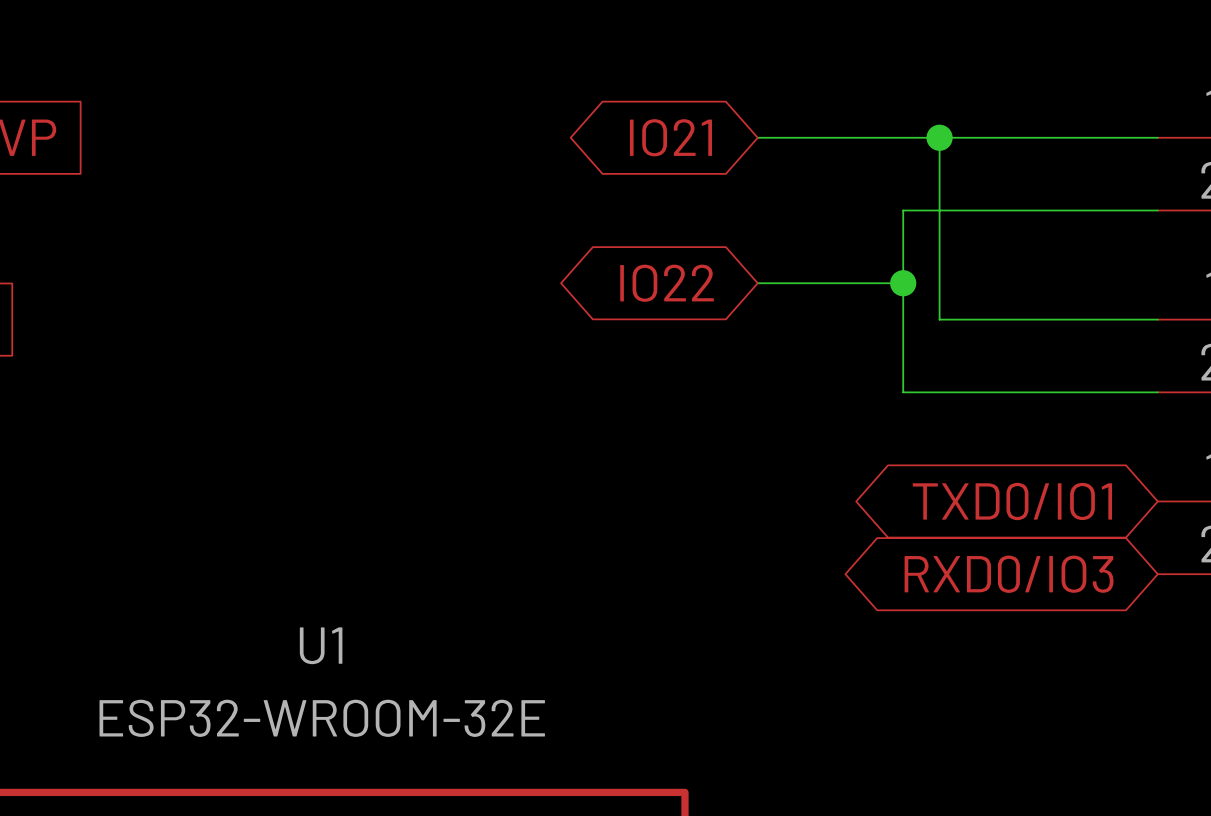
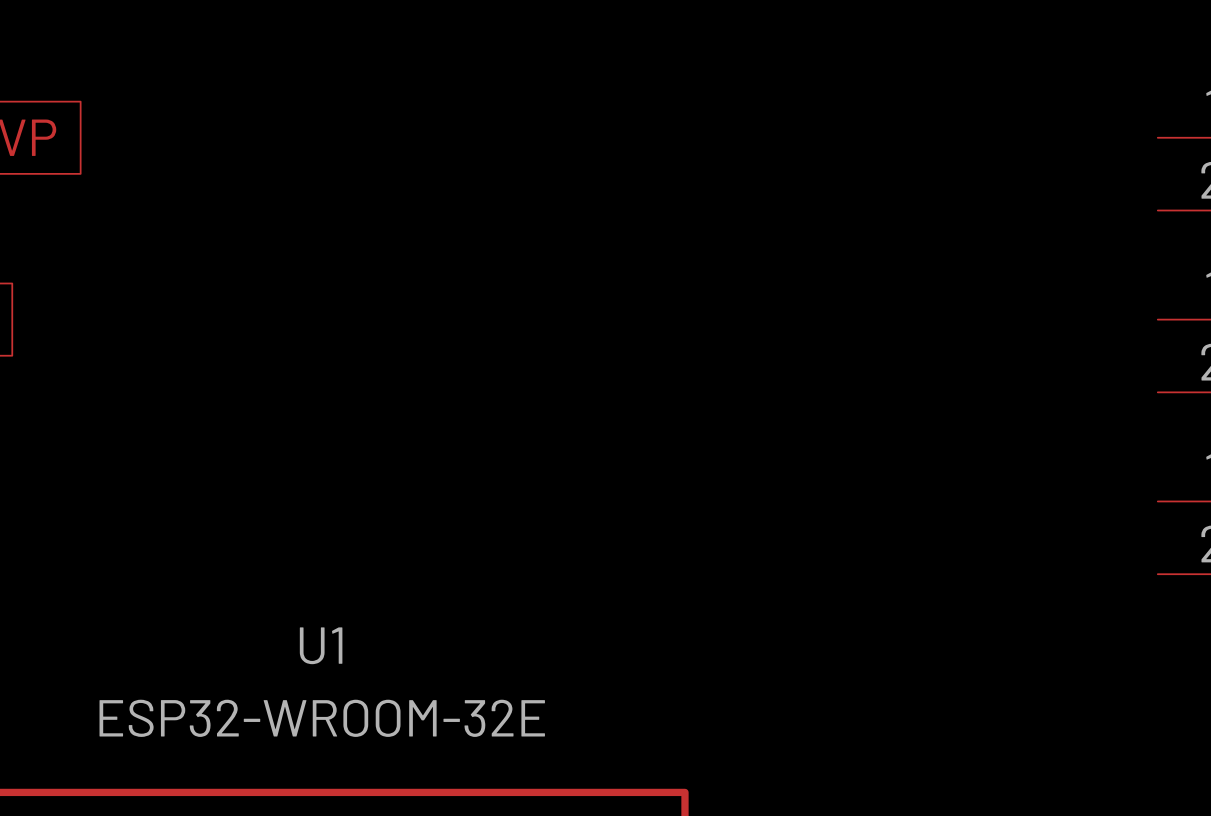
global label: IO21 (670, 137) -> none
wire: (757, 137) (1157, 137) -> none
wire: (939, 137) (939, 319) (1157, 319) -> none
junction: (939, 137) -> none
wire: (1157, 210) (903, 210) (903, 392) (1157, 392) -> none
global label: IO22 (667, 283) -> none
wire: (757, 283) (903, 283) -> none
junction: (903, 283) -> none
global label: TXD0/IO1 (1012, 501) -> none
global label: RXD0/IO3 (1009, 574) -> none

